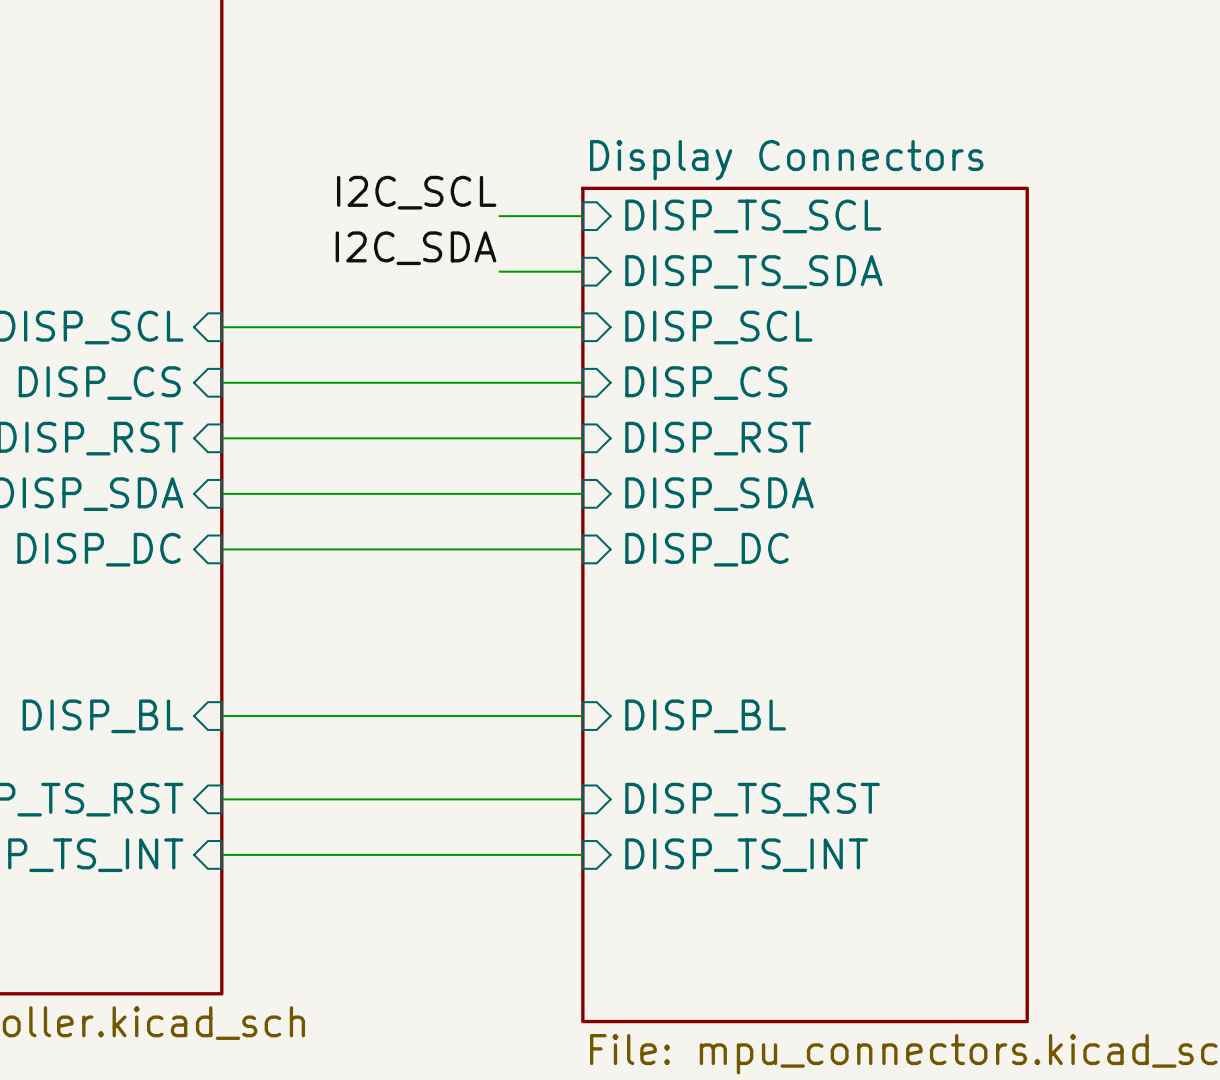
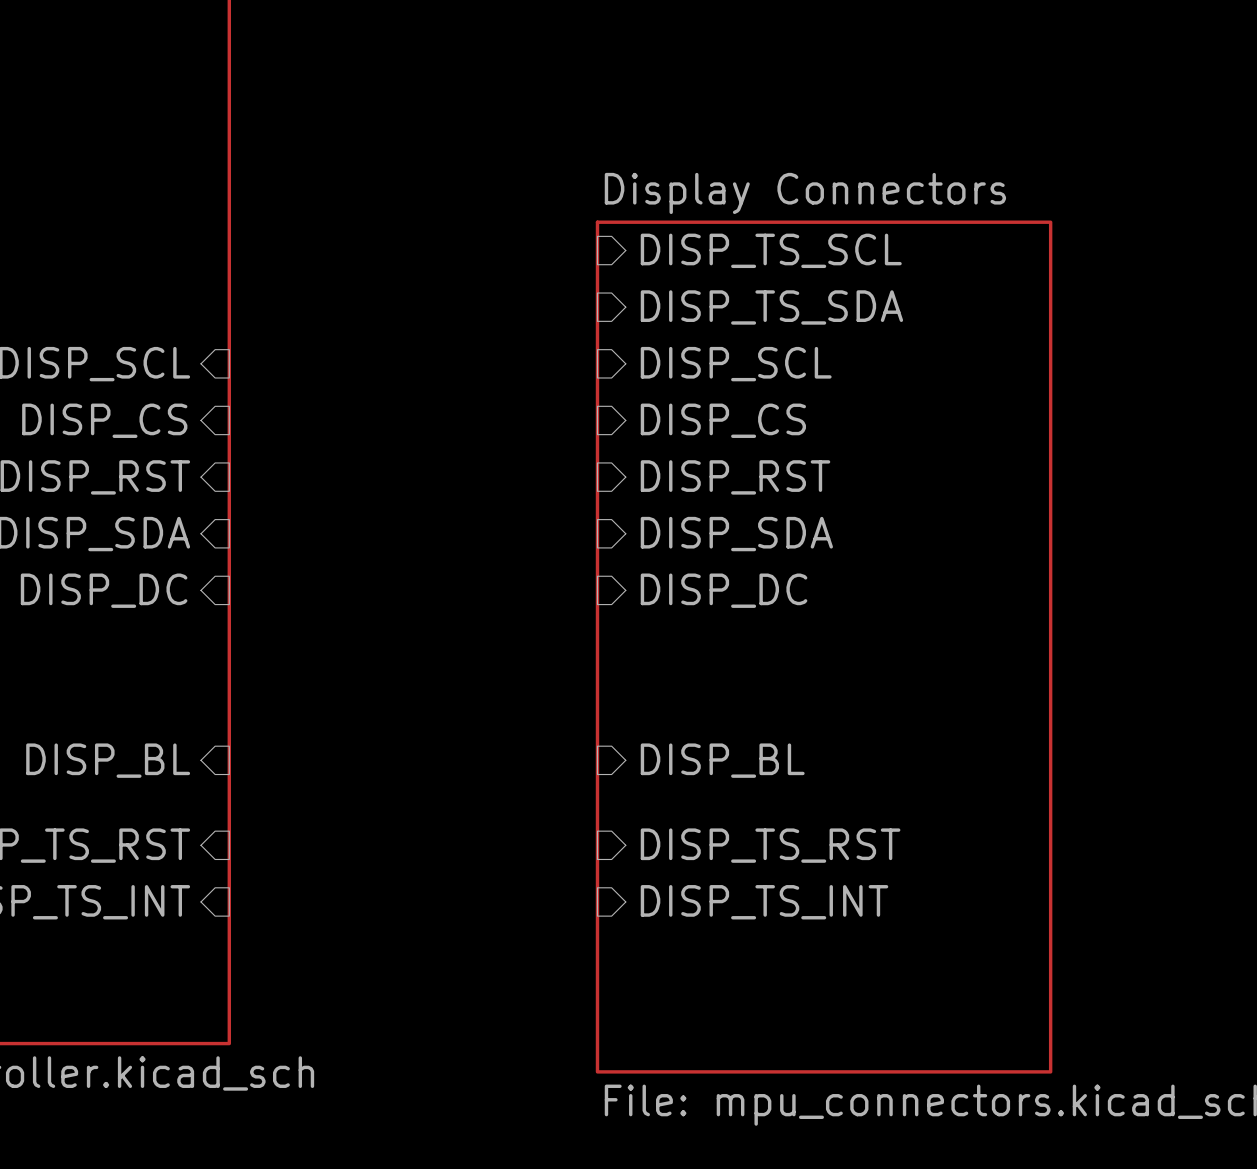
label: I2C_SCL (416, 192) -> none
wire: (499, 216) (582, 216) -> none
label: I2C_SDA (416, 248) -> none
wire: (499, 271) (582, 271) -> none
wire: (221, 327) (582, 327) -> none
wire: (221, 382) (582, 382) -> none
wire: (221, 438) (582, 438) -> none
wire: (221, 493) (582, 493) -> none
wire: (221, 549) (582, 549) -> none
wire: (221, 716) (582, 716) -> none
wire: (221, 799) (582, 799) -> none
wire: (221, 854) (582, 854) -> none

